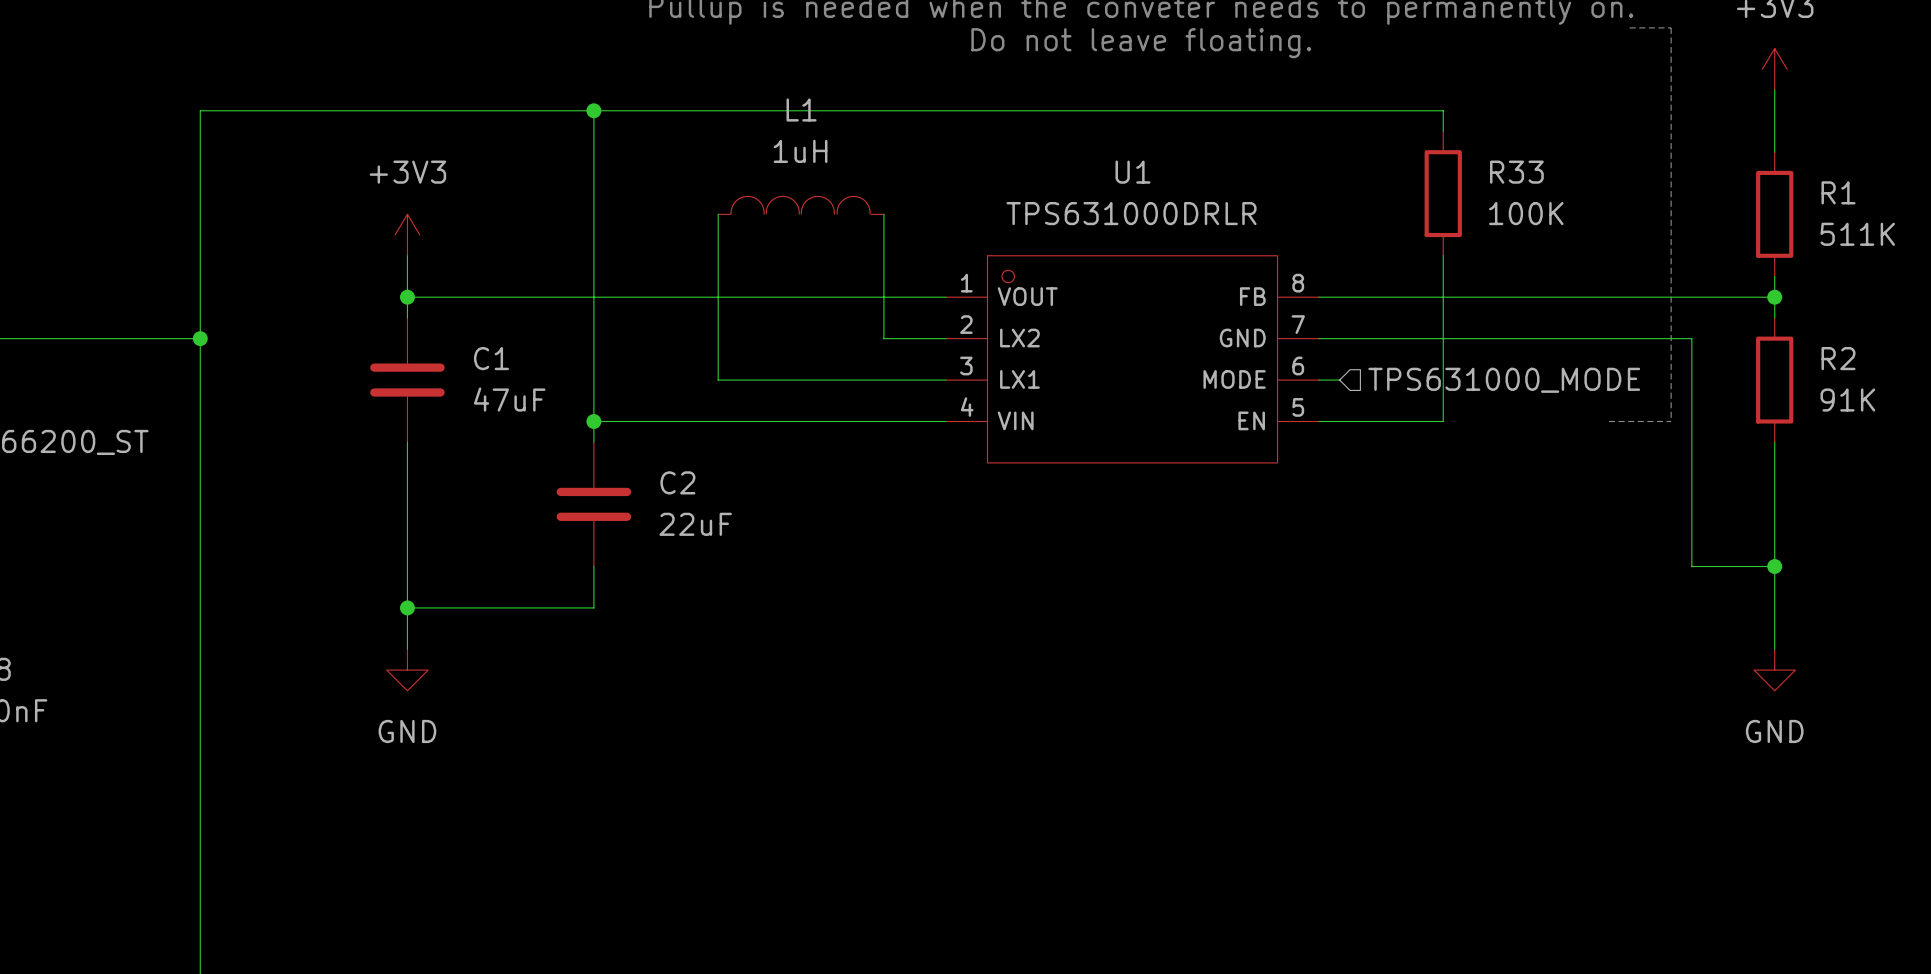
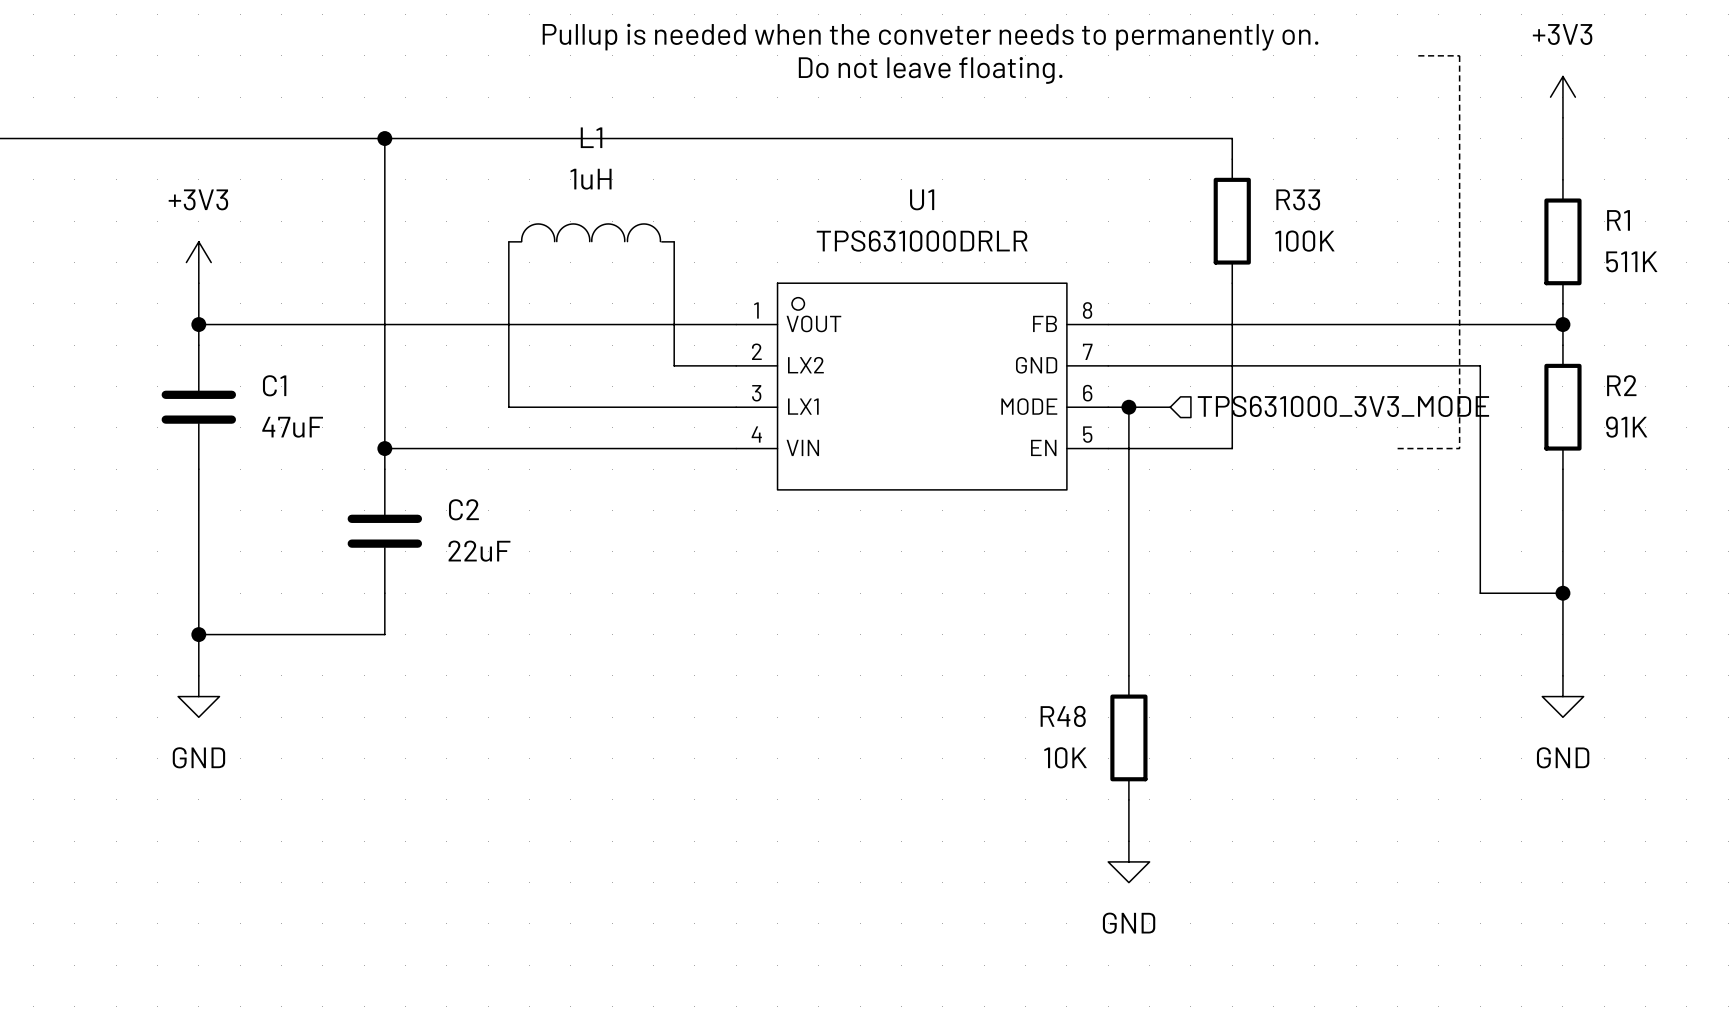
junction: none -> (1128, 407)
wire: none -> (1170, 407) (1128, 407) (1128, 675)
hierarchical label: TPS631000_MODE (1504, 380) -> TPS631000_3V3_MODE (1343, 406)
R48: none -> 10K (1128, 737)
wire: none -> (1128, 799) (1128, 841)
power symbol: none -> GND (1128, 861)

